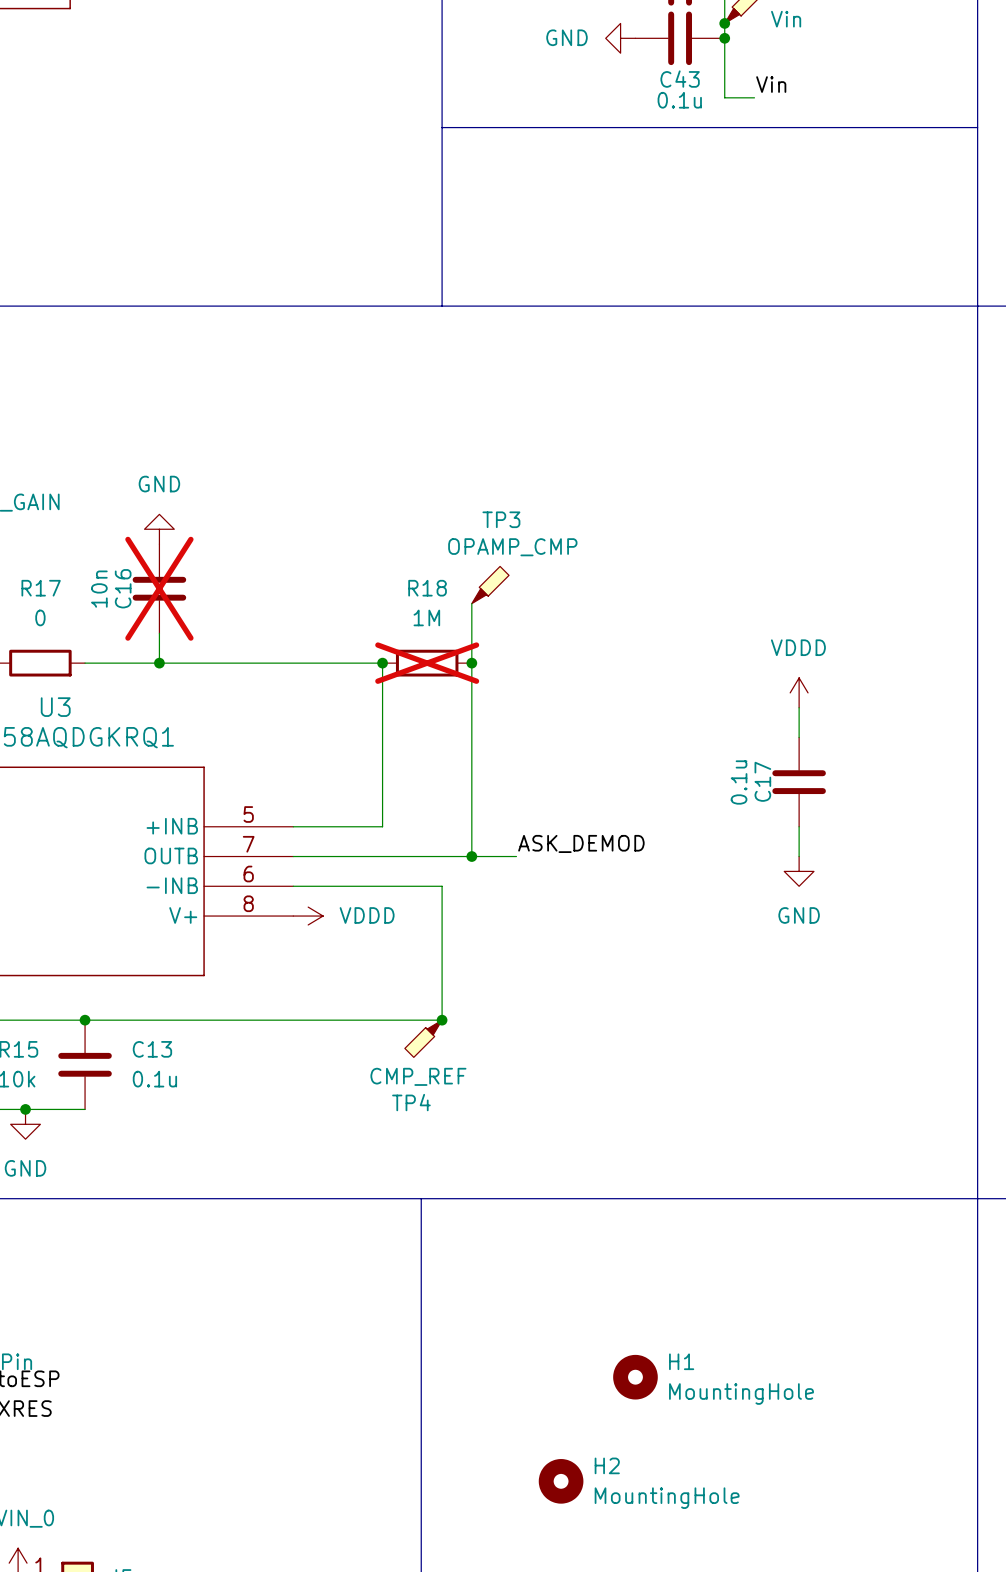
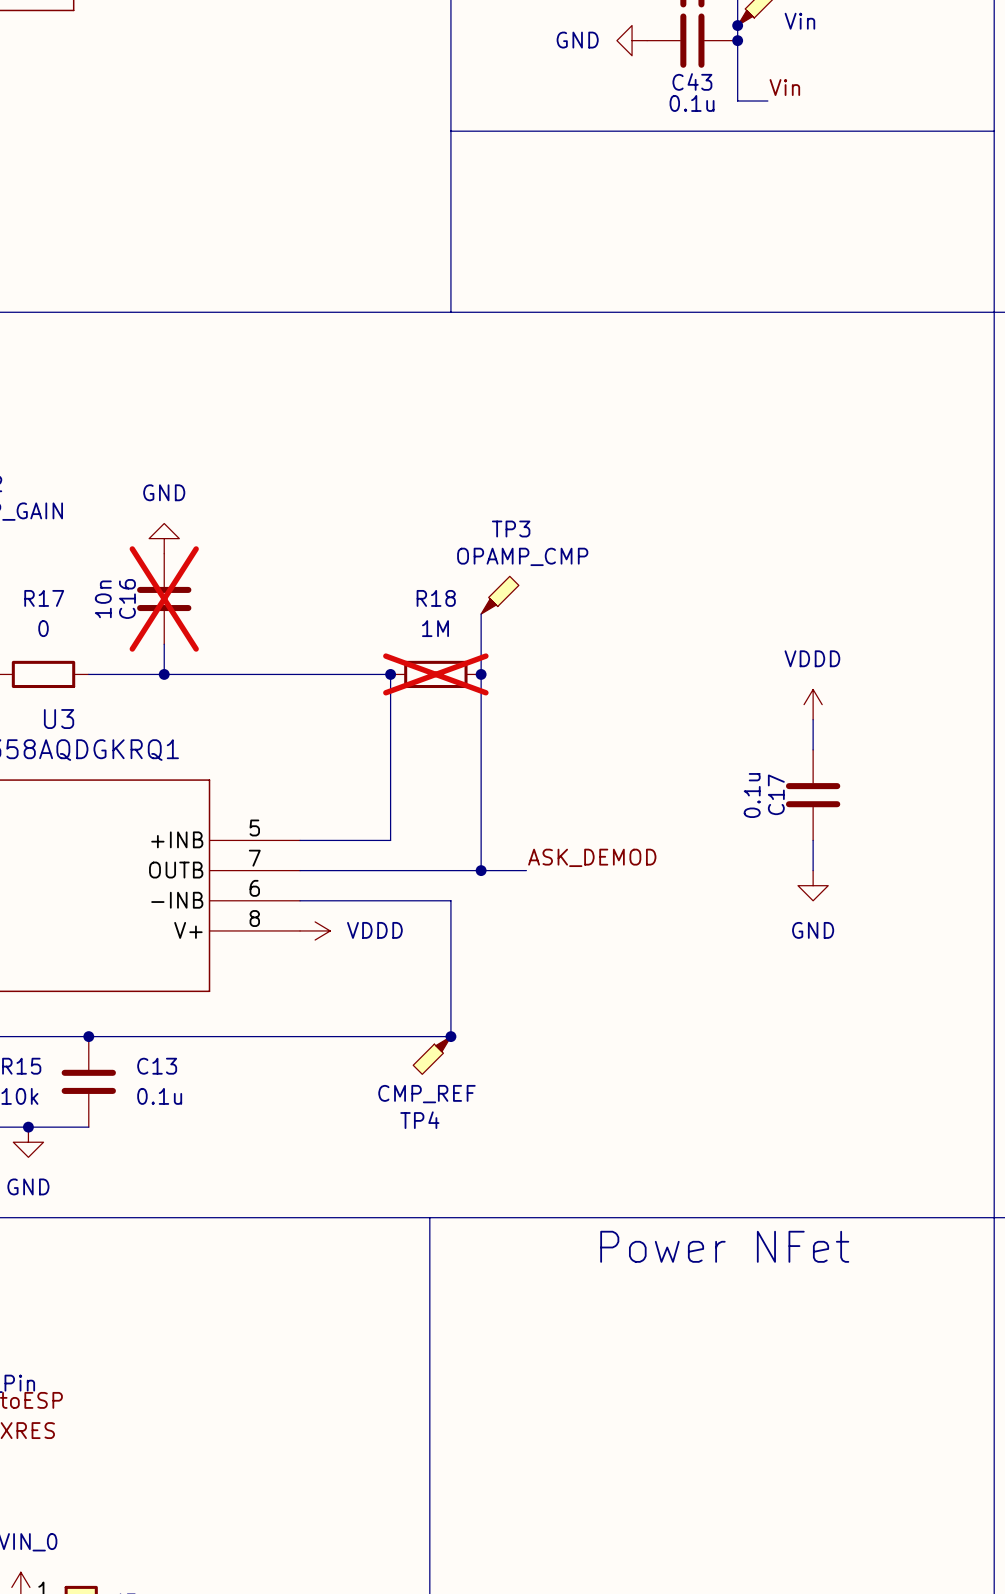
text: none -> Power NFet (724, 1246)
H1: MountingHole (635, 1377) -> none
H2: MountingHole (561, 1481) -> none

